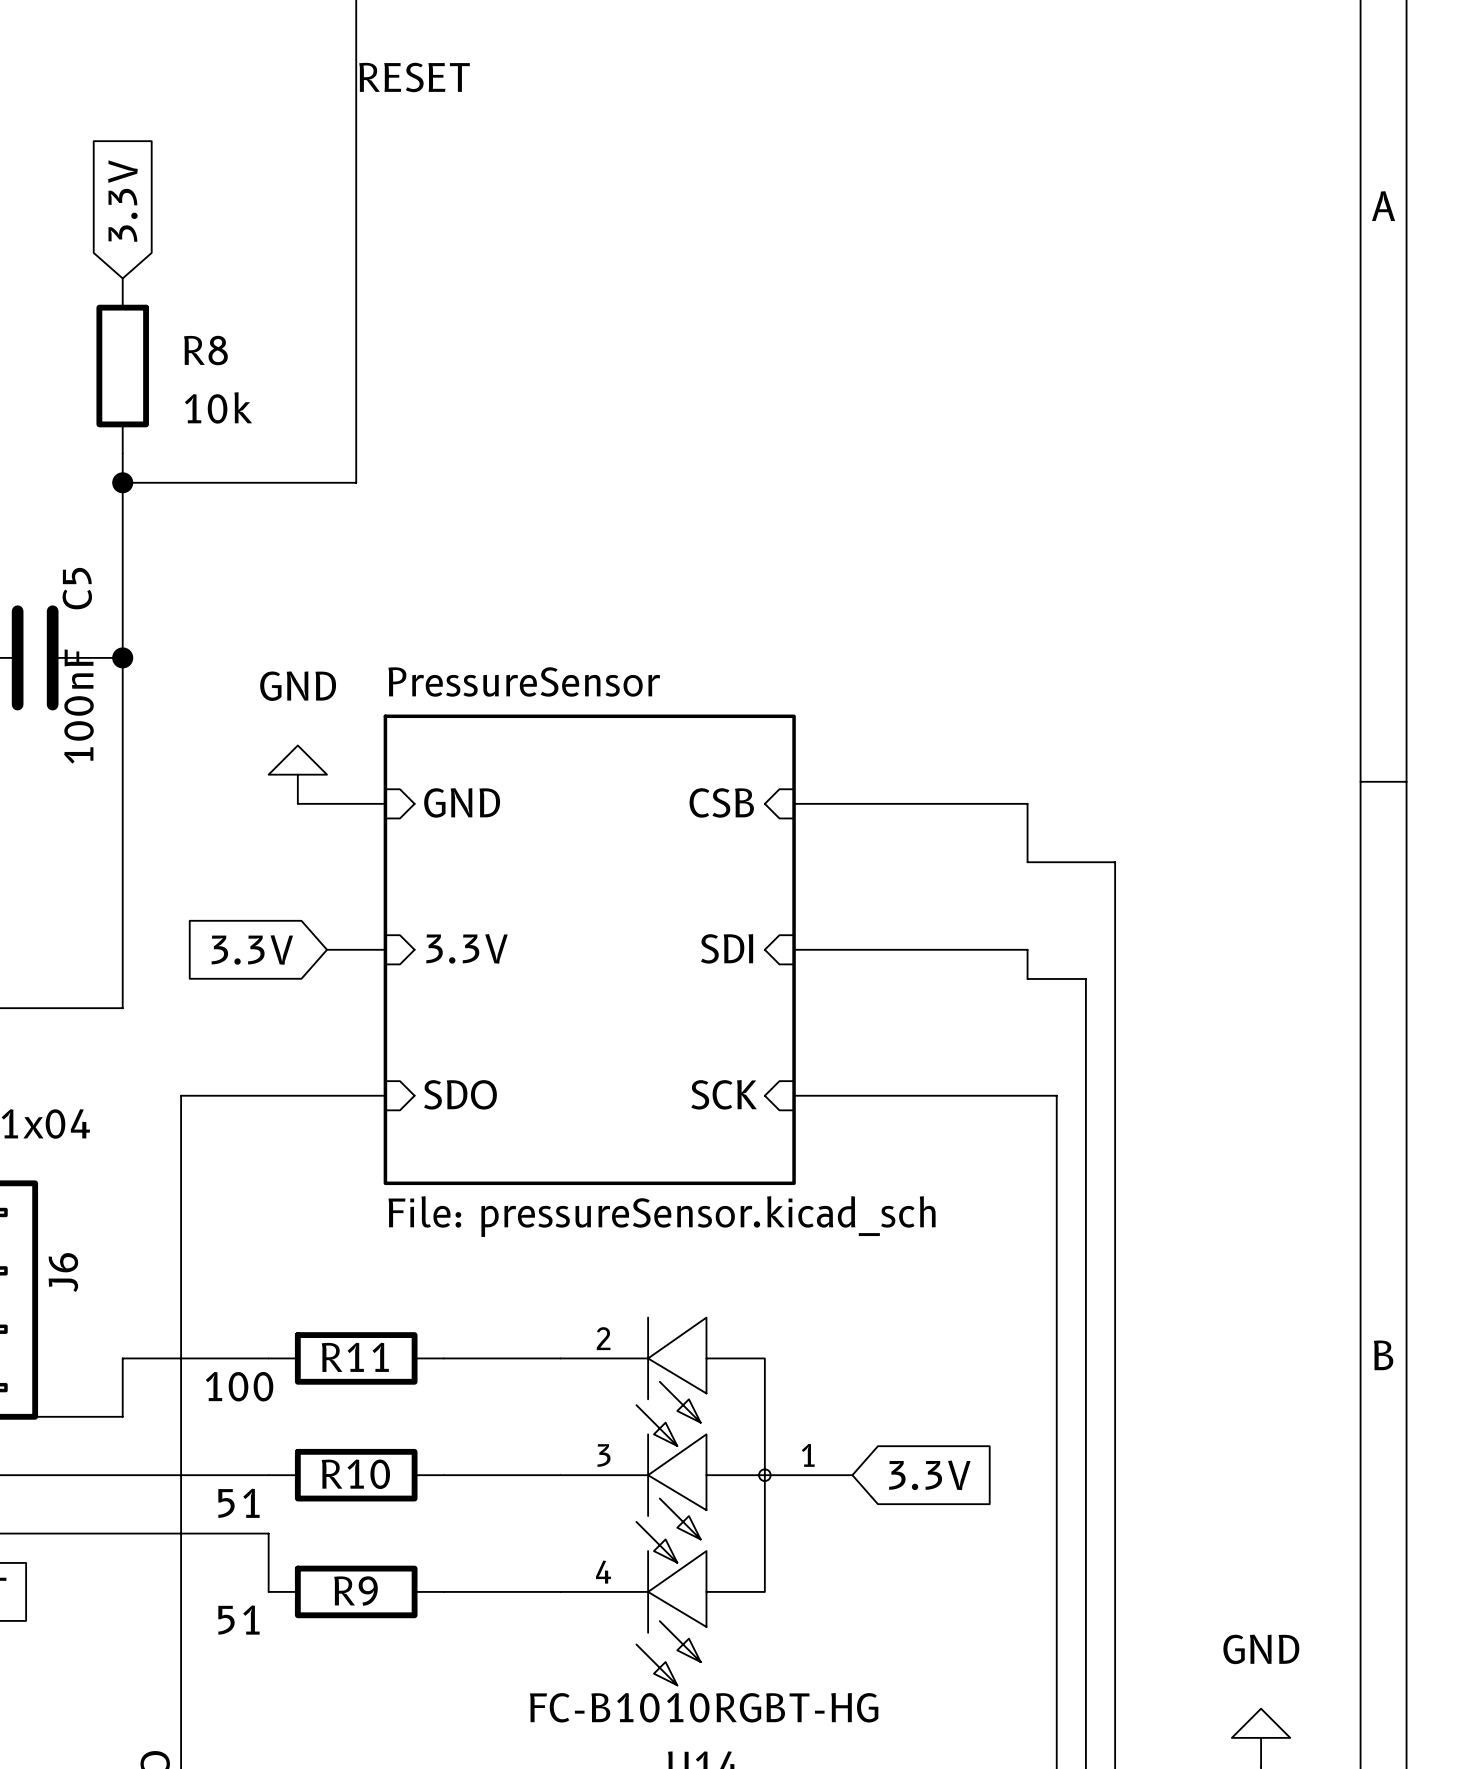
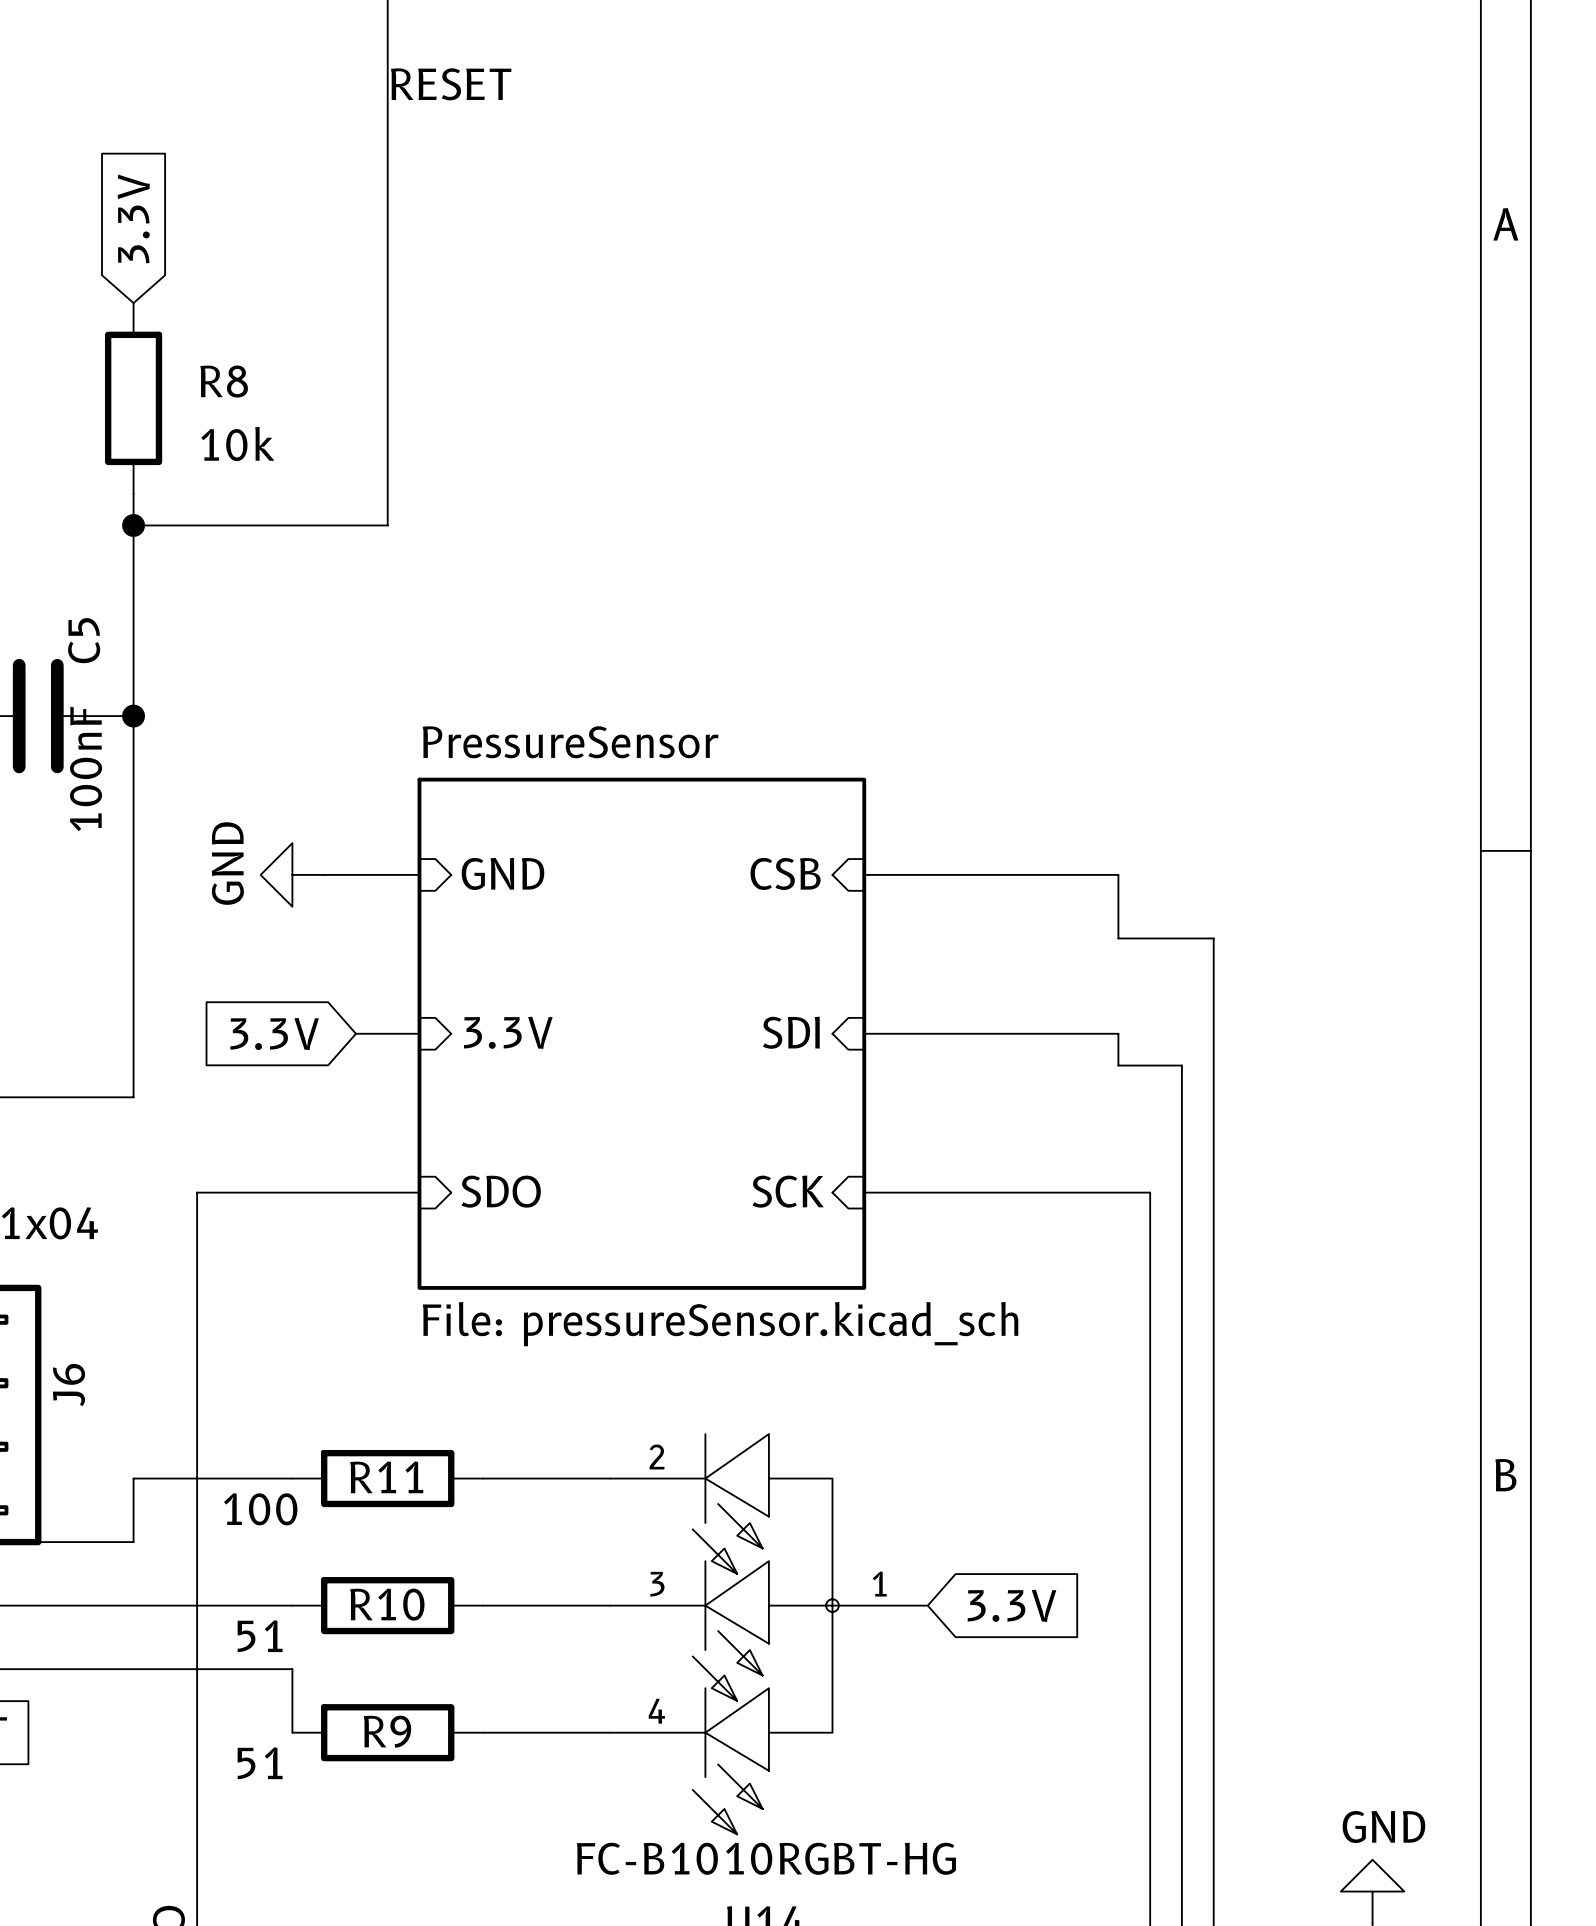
power symbol rotation: 0° (297, 774) -> 90° counterclockwise (292, 874)
power symbol position: GND (297, 774) -> GND (292, 874)
power symbol text position: GND (1261, 1649) -> GND (1383, 1826)

